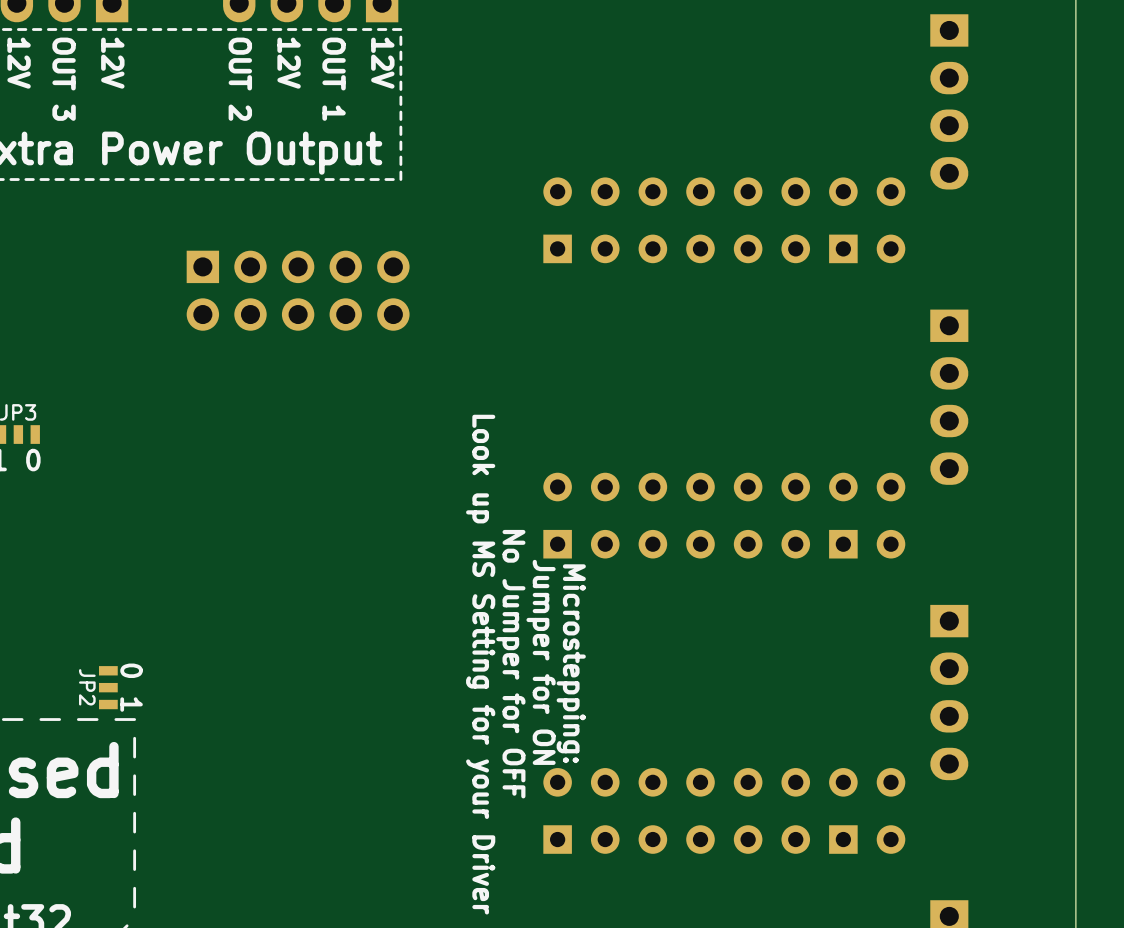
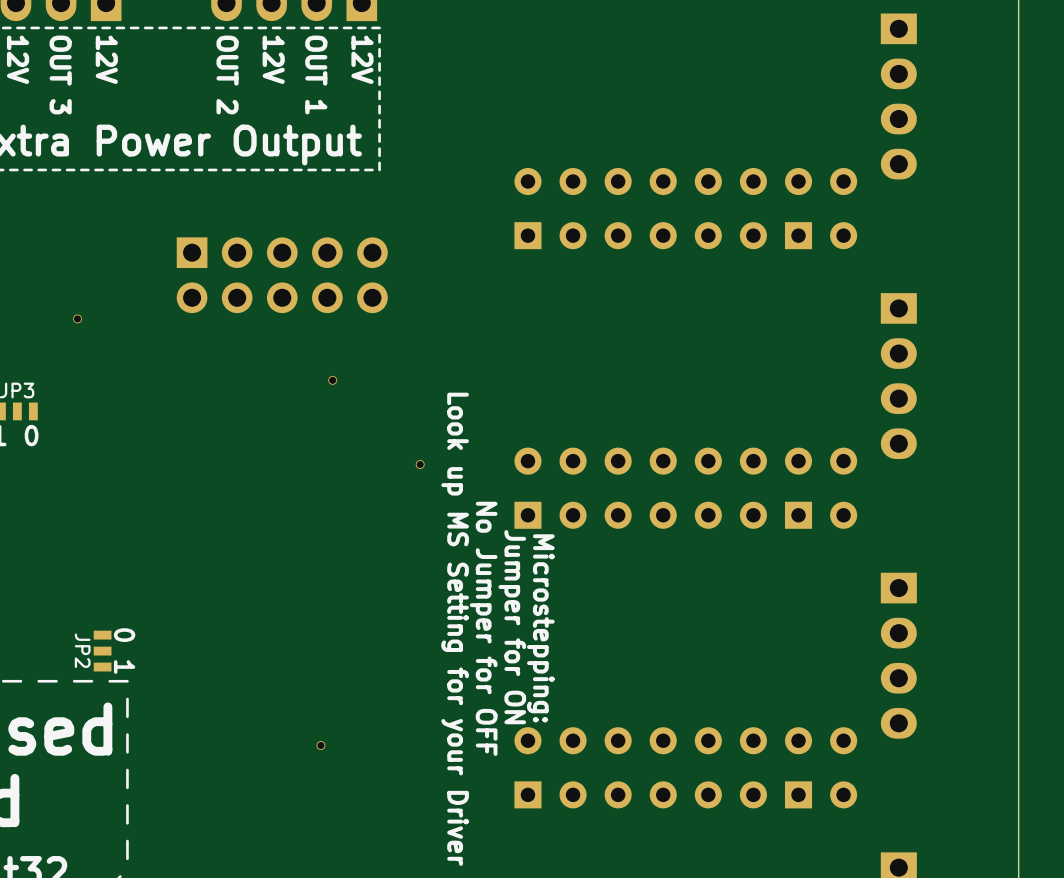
part: none -> (77, 318)
part: none -> (332, 380)
part: none -> (420, 464)
part: none -> (320, 745)

